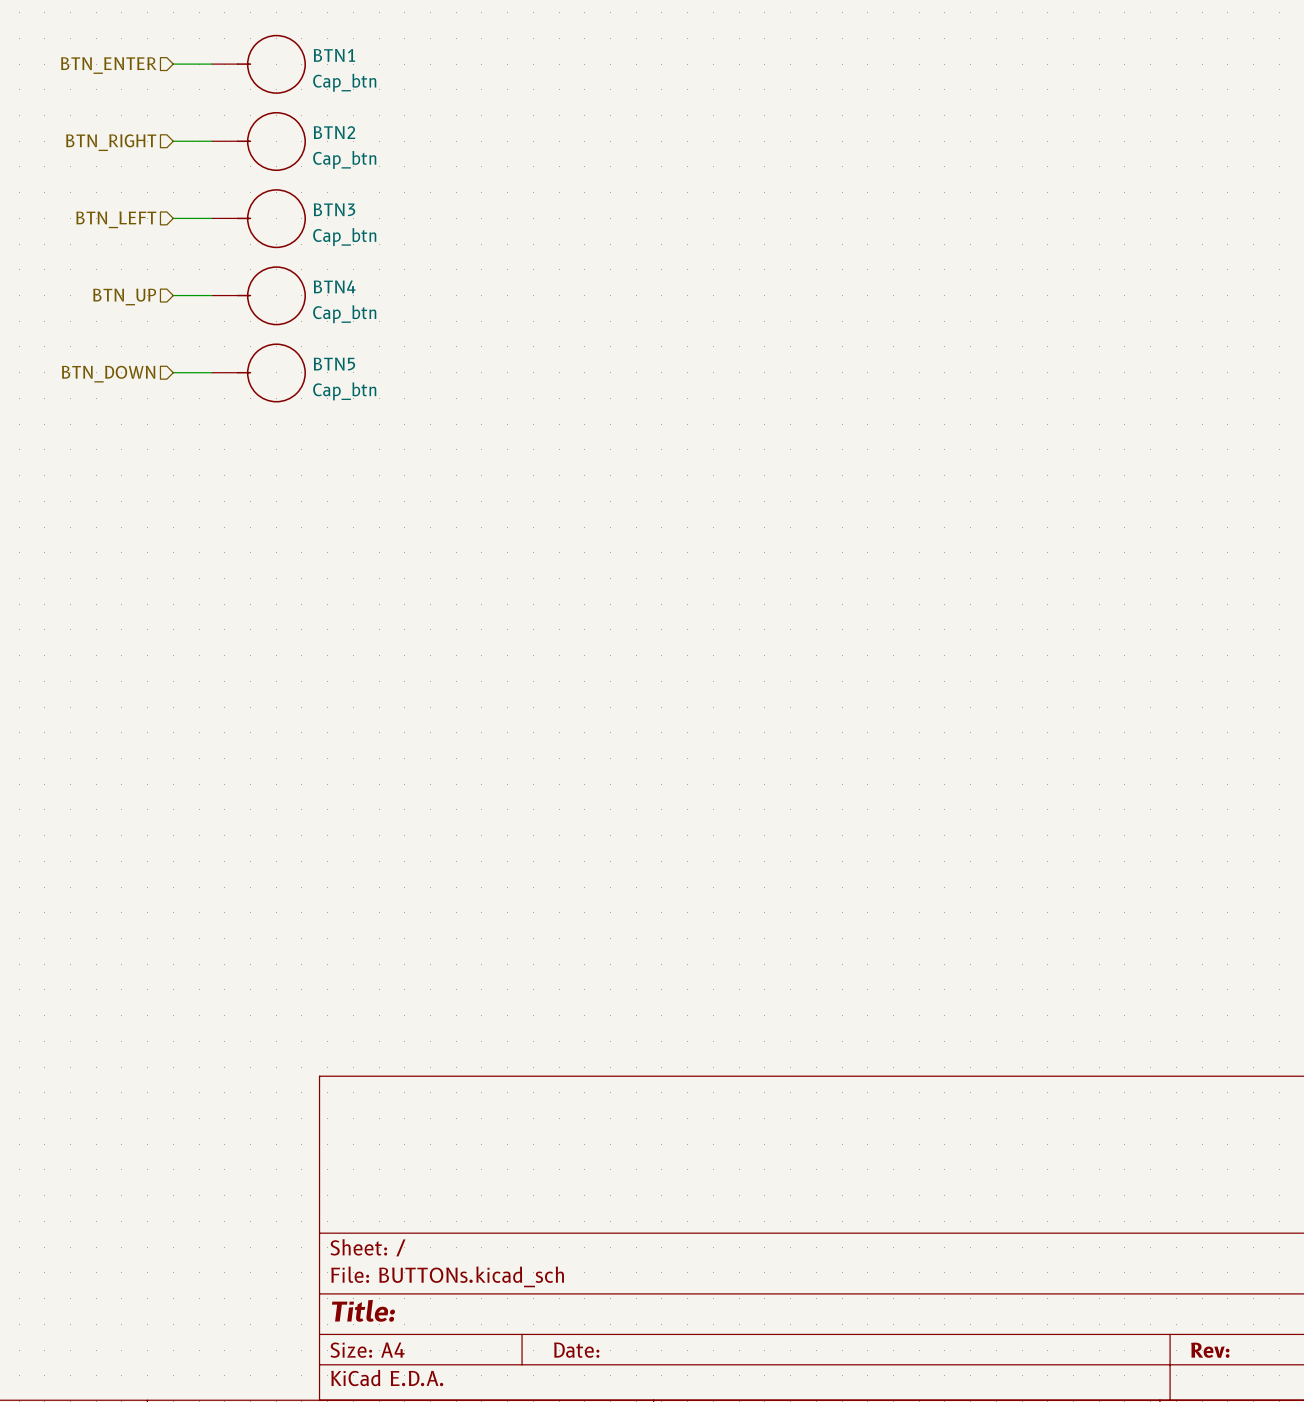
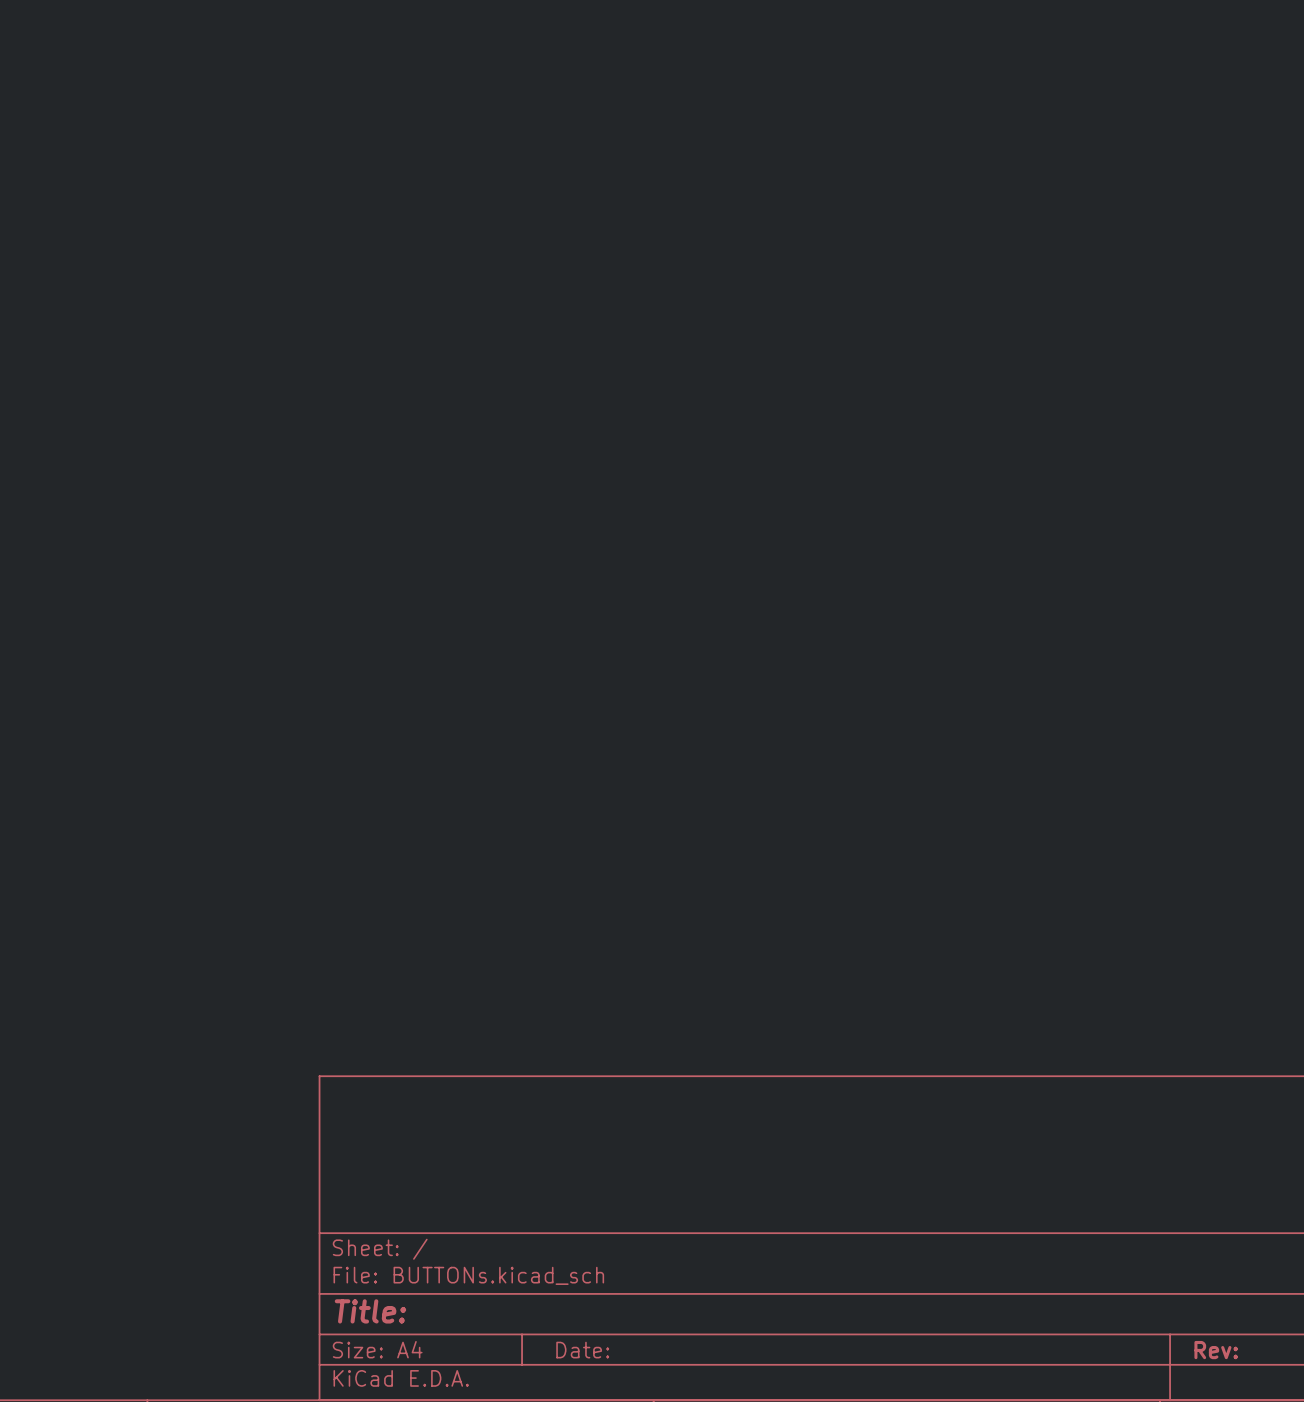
wire: (173, 64) (211, 64) -> none
BTN1: Cap_btn (258, 64) -> none
hierarchical label: BTN_ENTER (108, 65) -> none
wire: (173, 141) (211, 141) -> none
BTN2: Cap_btn (258, 141) -> none
hierarchical label: BTN_RIGHT (111, 142) -> none
wire: (173, 218) (211, 218) -> none
BTN3: Cap_btn (258, 218) -> none
hierarchical label: BTN_LEFT (116, 219) -> none
wire: (173, 295) (211, 295) -> none
BTN4: Cap_btn (258, 295) -> none
hierarchical label: BTN_UP (124, 297) -> none
wire: (173, 372) (211, 372) -> none
BTN5: Cap_btn (258, 372) -> none
hierarchical label: BTN_DOWN (108, 374) -> none

